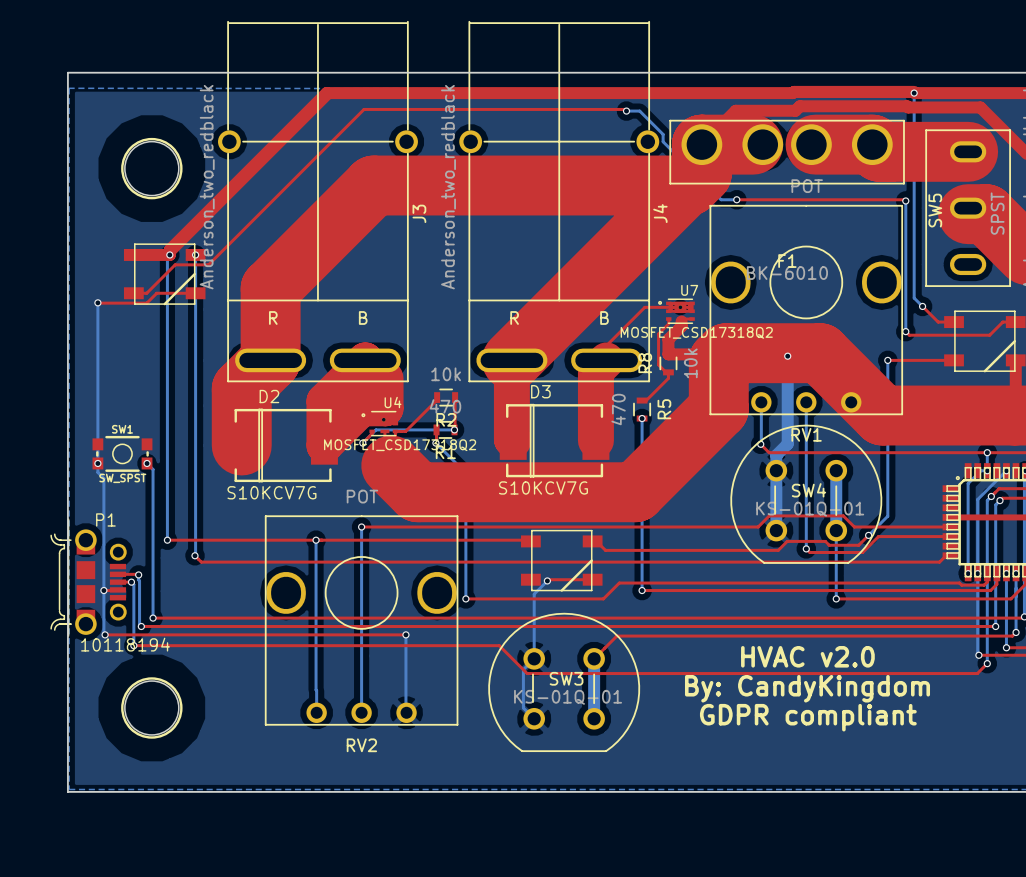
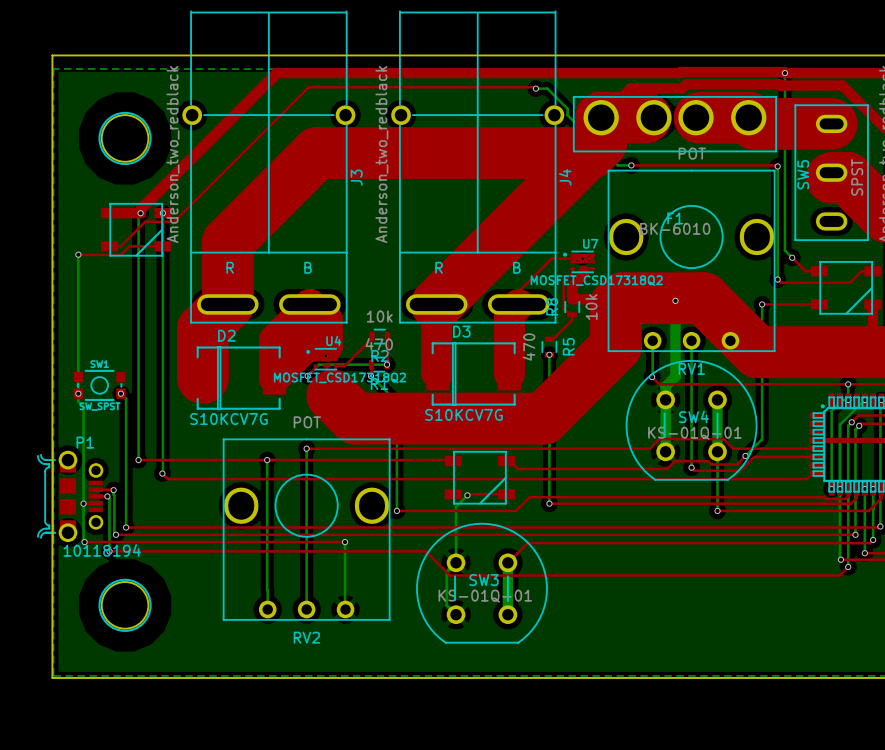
text: HVAC v2.0 (807, 656) -> none
text: By: CandyKingdom (807, 688) -> none
text: GDPR compliant (808, 717) -> none

